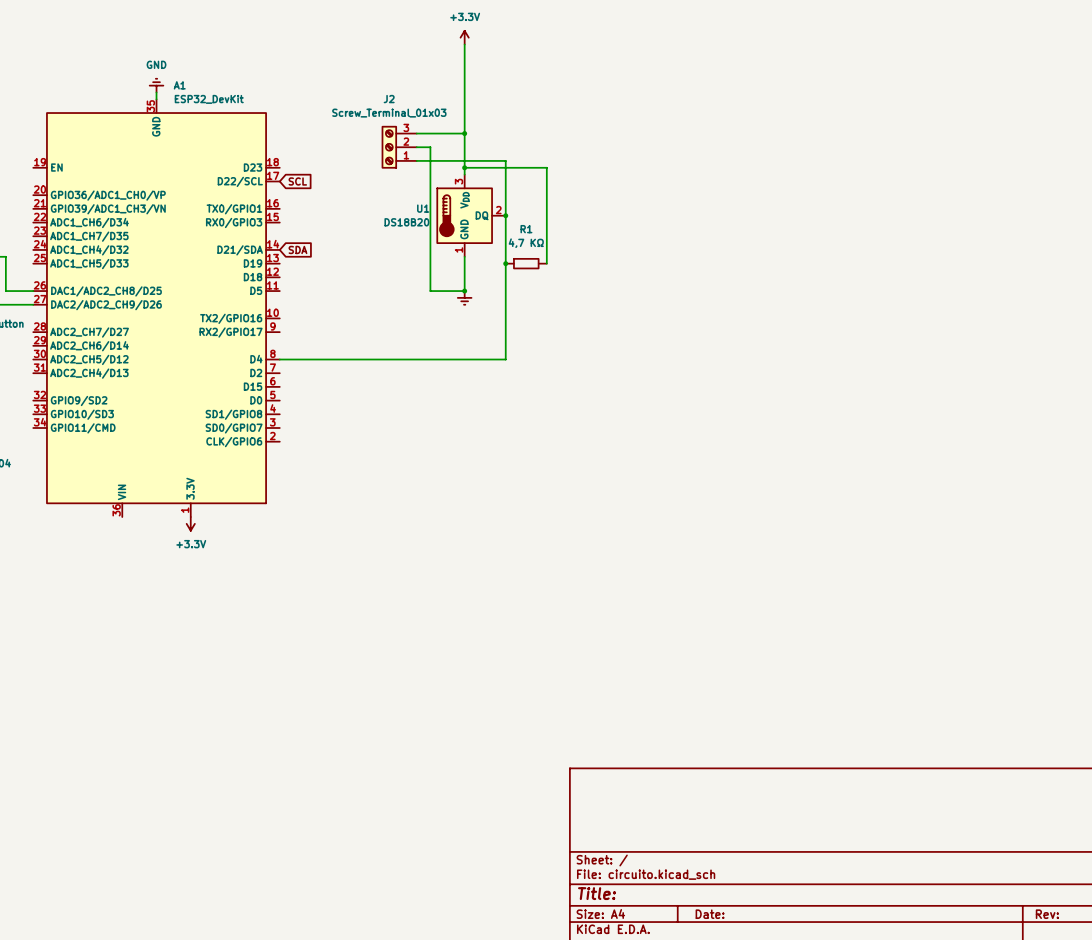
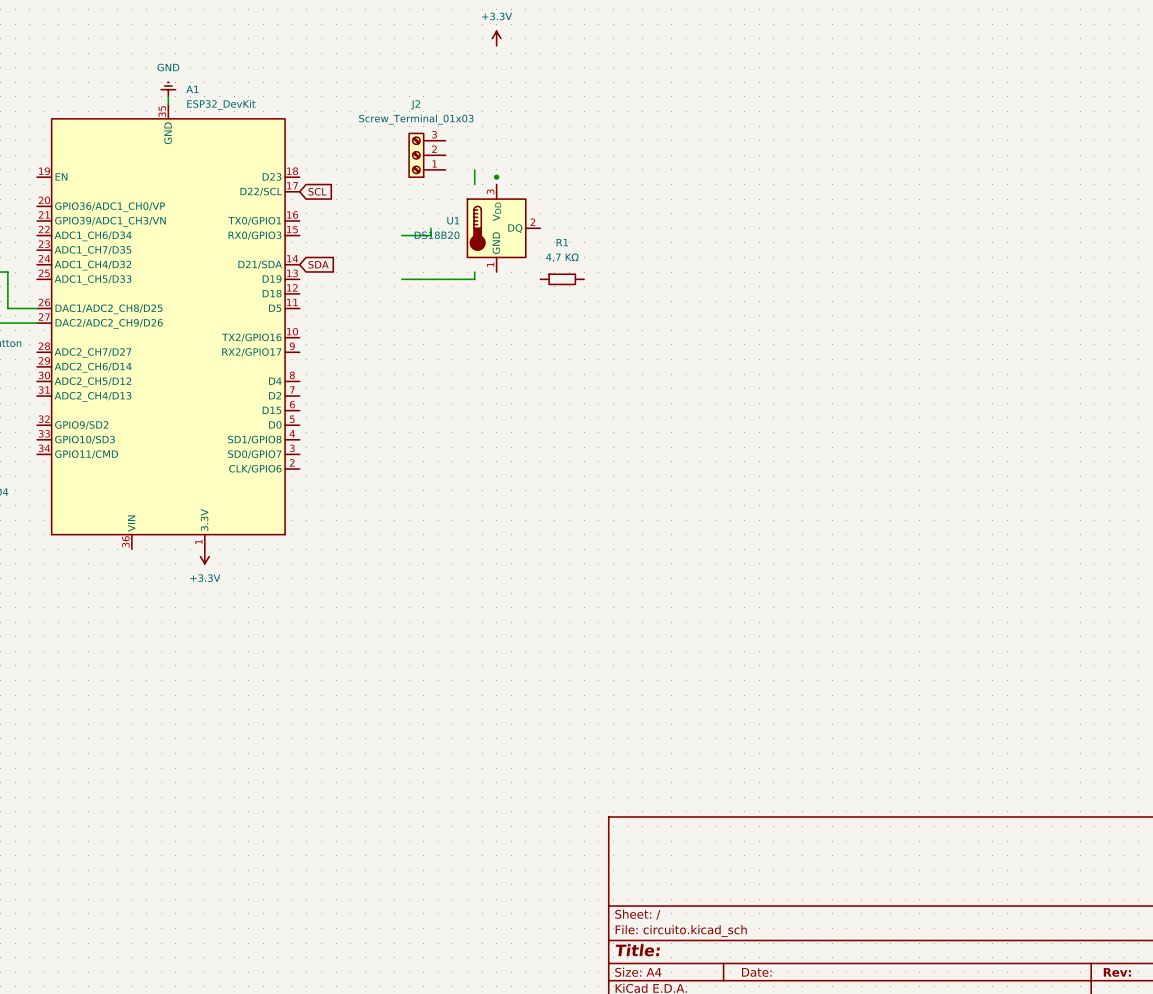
wire: (464, 44) (464, 174) -> none
wire: (416, 133) (464, 133) -> none
junction: (464, 133) -> none
wire: (416, 147) (430, 147) (430, 291) (464, 291) (464, 256) -> none
wire: (416, 160) (505, 160) (505, 359) (279, 359) -> none
wire: none -> (474, 169) (474, 184)
wire: (464, 167) (546, 167) (546, 263) -> none
wire: none -> (430, 228) (430, 235) (401, 235)
junction: (505, 215) -> none
wire: none -> (474, 272) (474, 279) (401, 279)
junction: (505, 263) -> none
junction: (464, 291) -> none
power symbol: (464, 297) -> none

